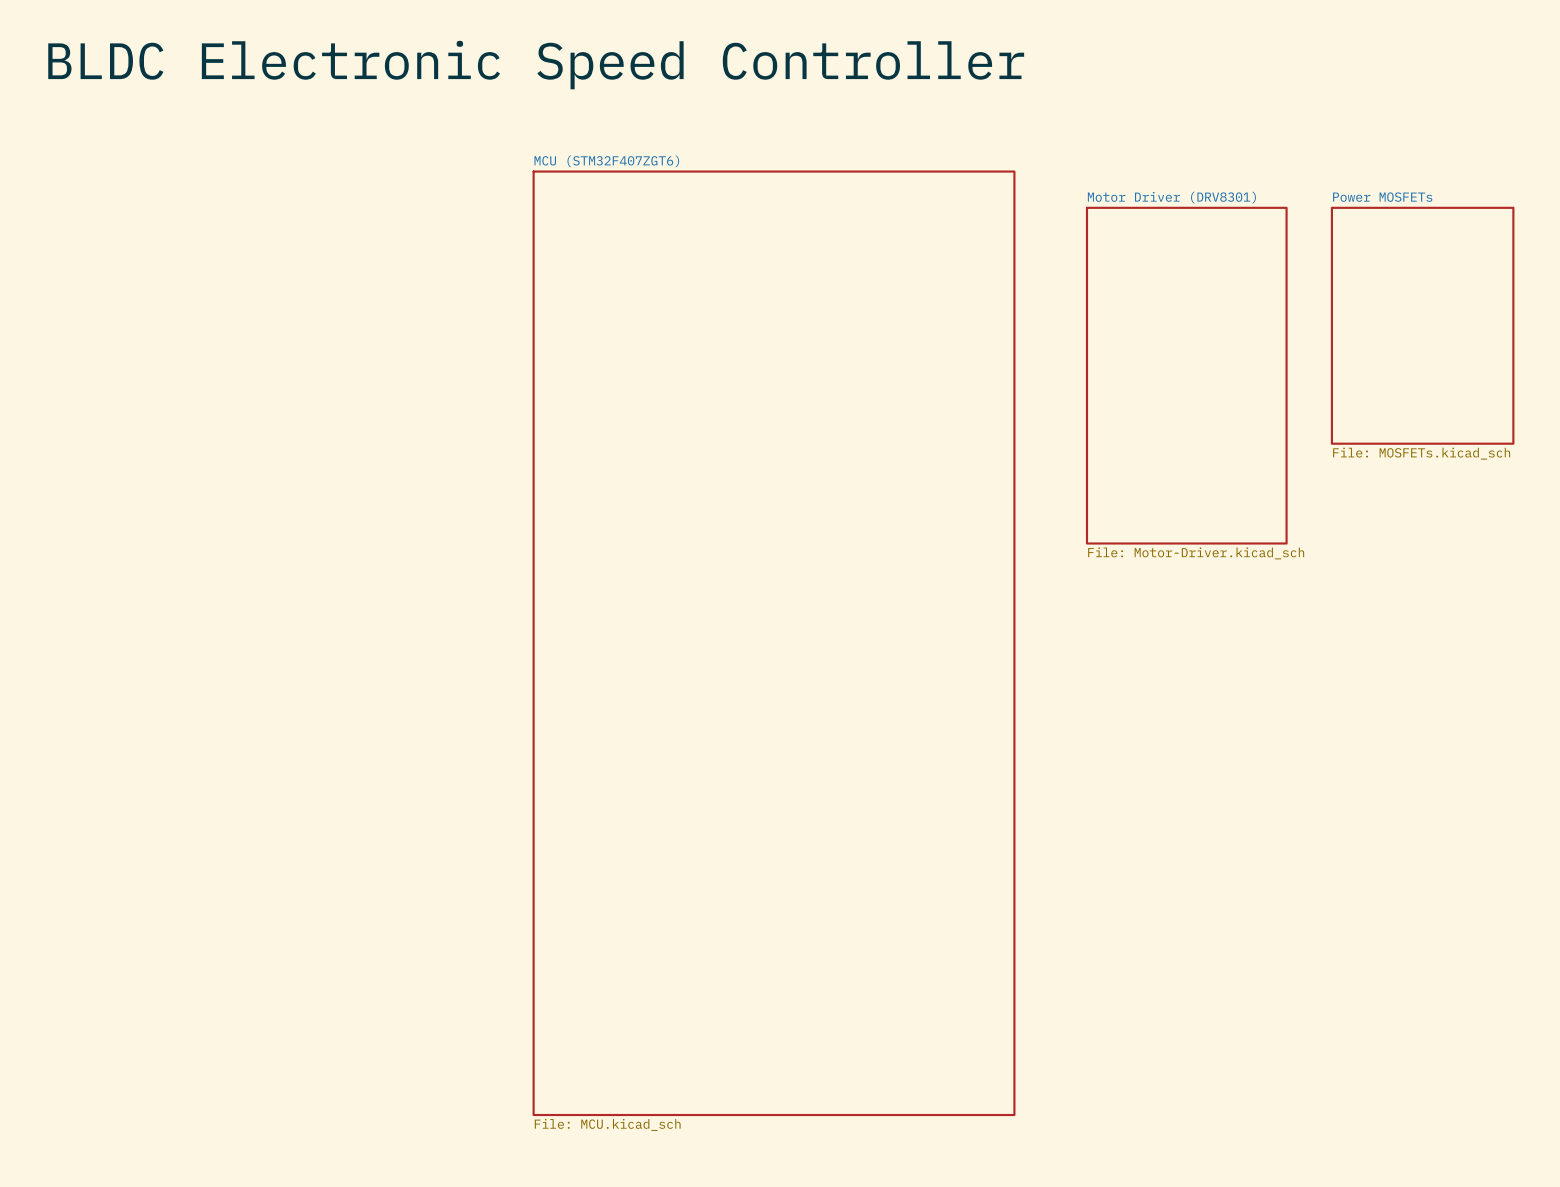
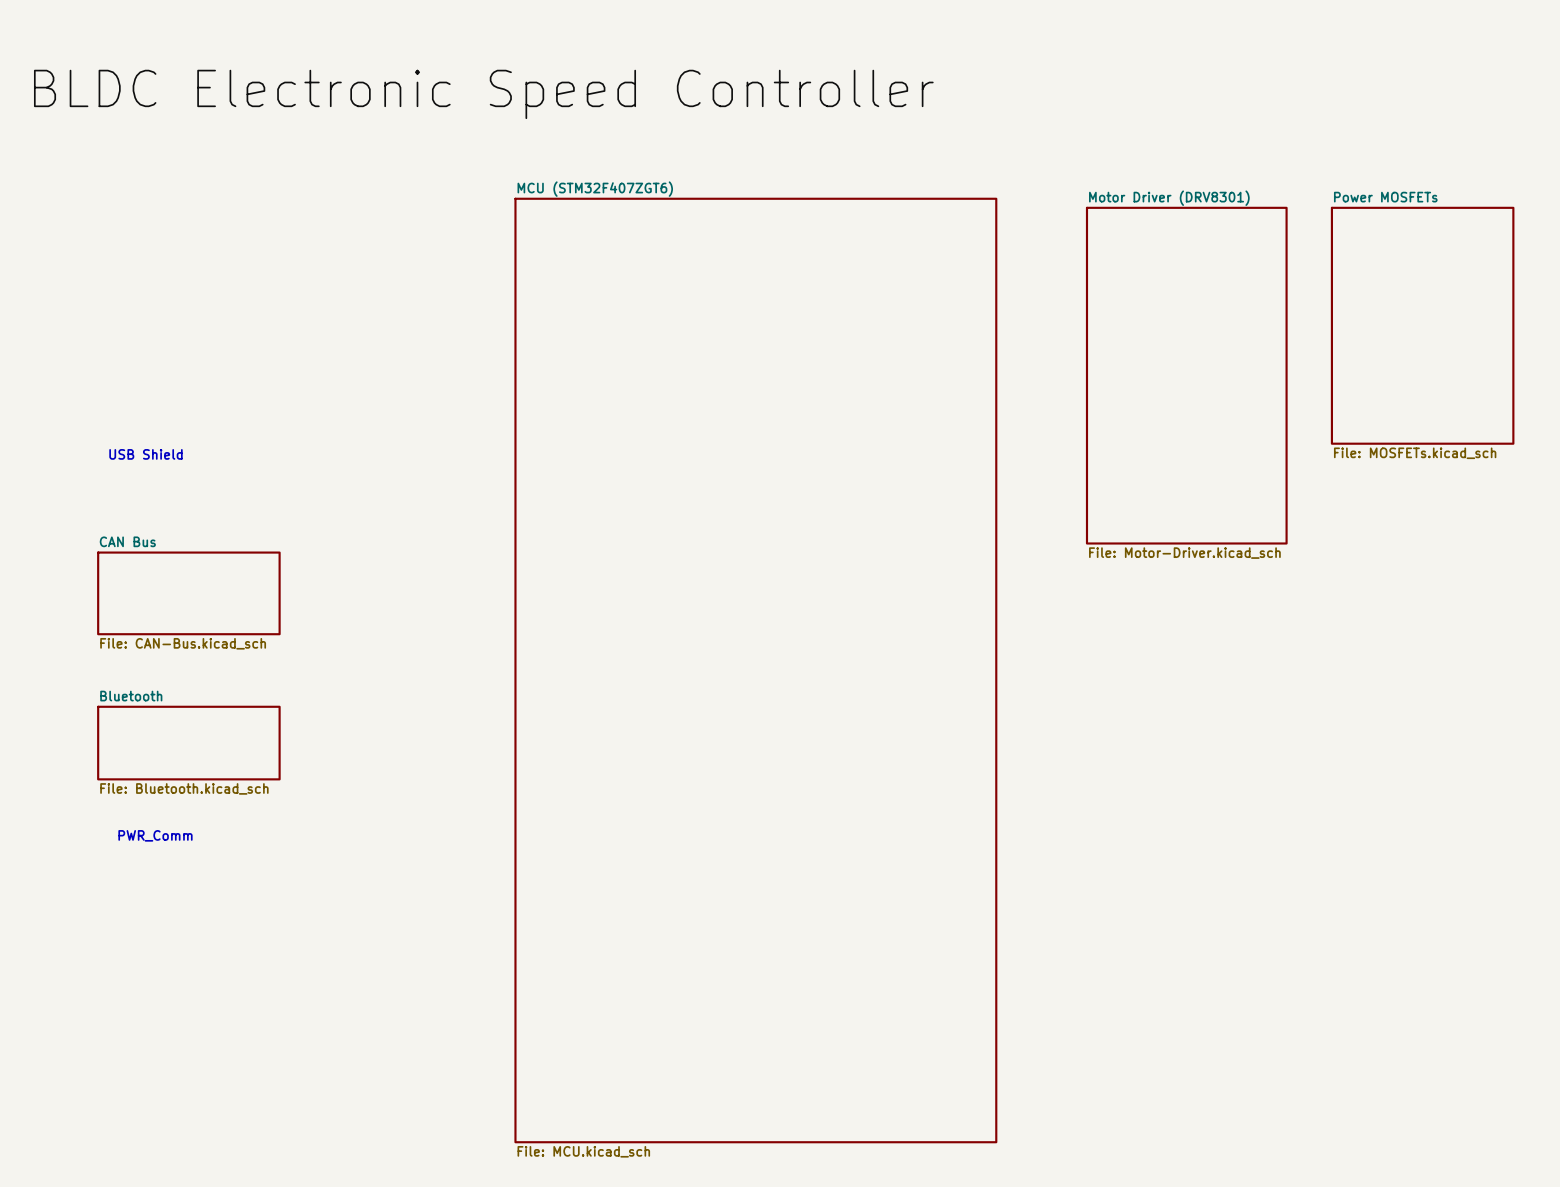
label position: BLDC Electronic Speed Controller (536, 65) -> BLDC Electronic Speed Controller (483, 94)
text: none -> USB Shield (145, 454)
sheet CAN Bus: none -> File: CAN-Bus.kicad_sch (188, 593)
sheet MCU (STM32F407ZGT6) position: (774, 643) -> (755, 670)
sheet Bluetooth: none -> File: Bluetooth.kicad_sch (188, 743)
text: none -> PWR_Comm (155, 835)

